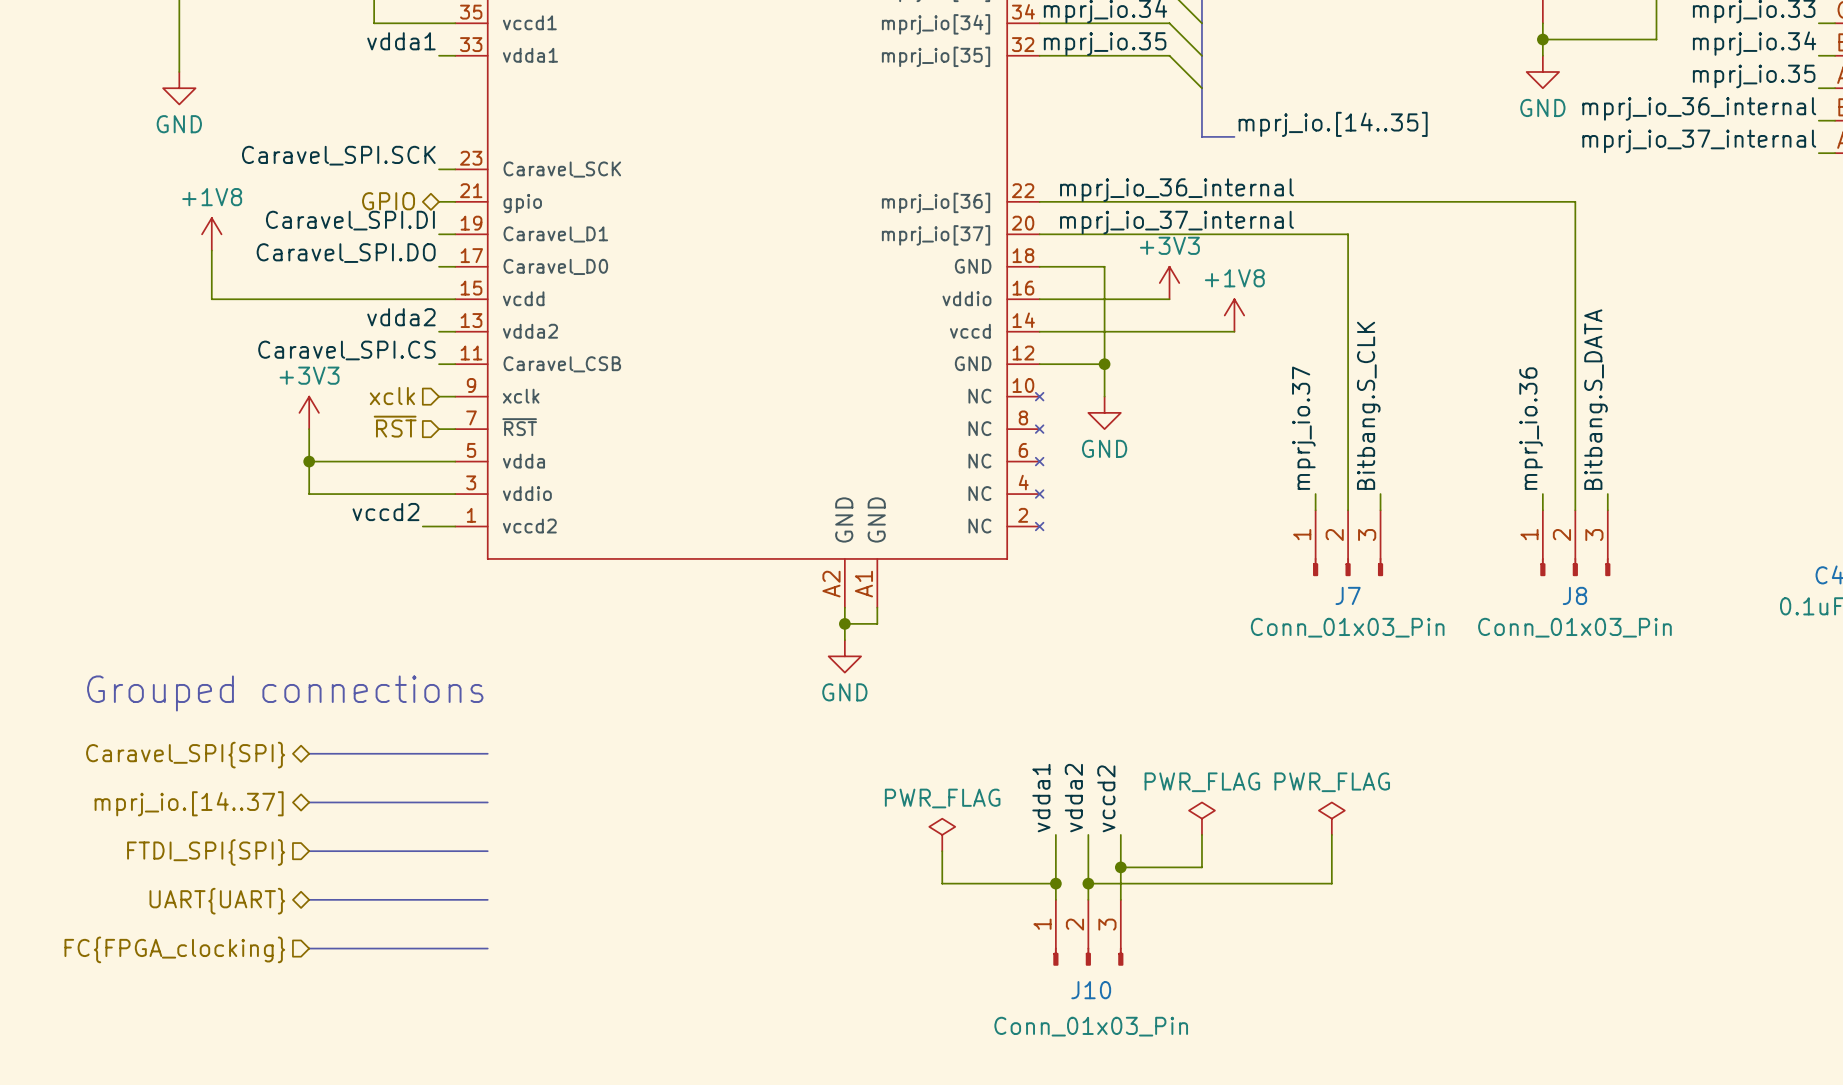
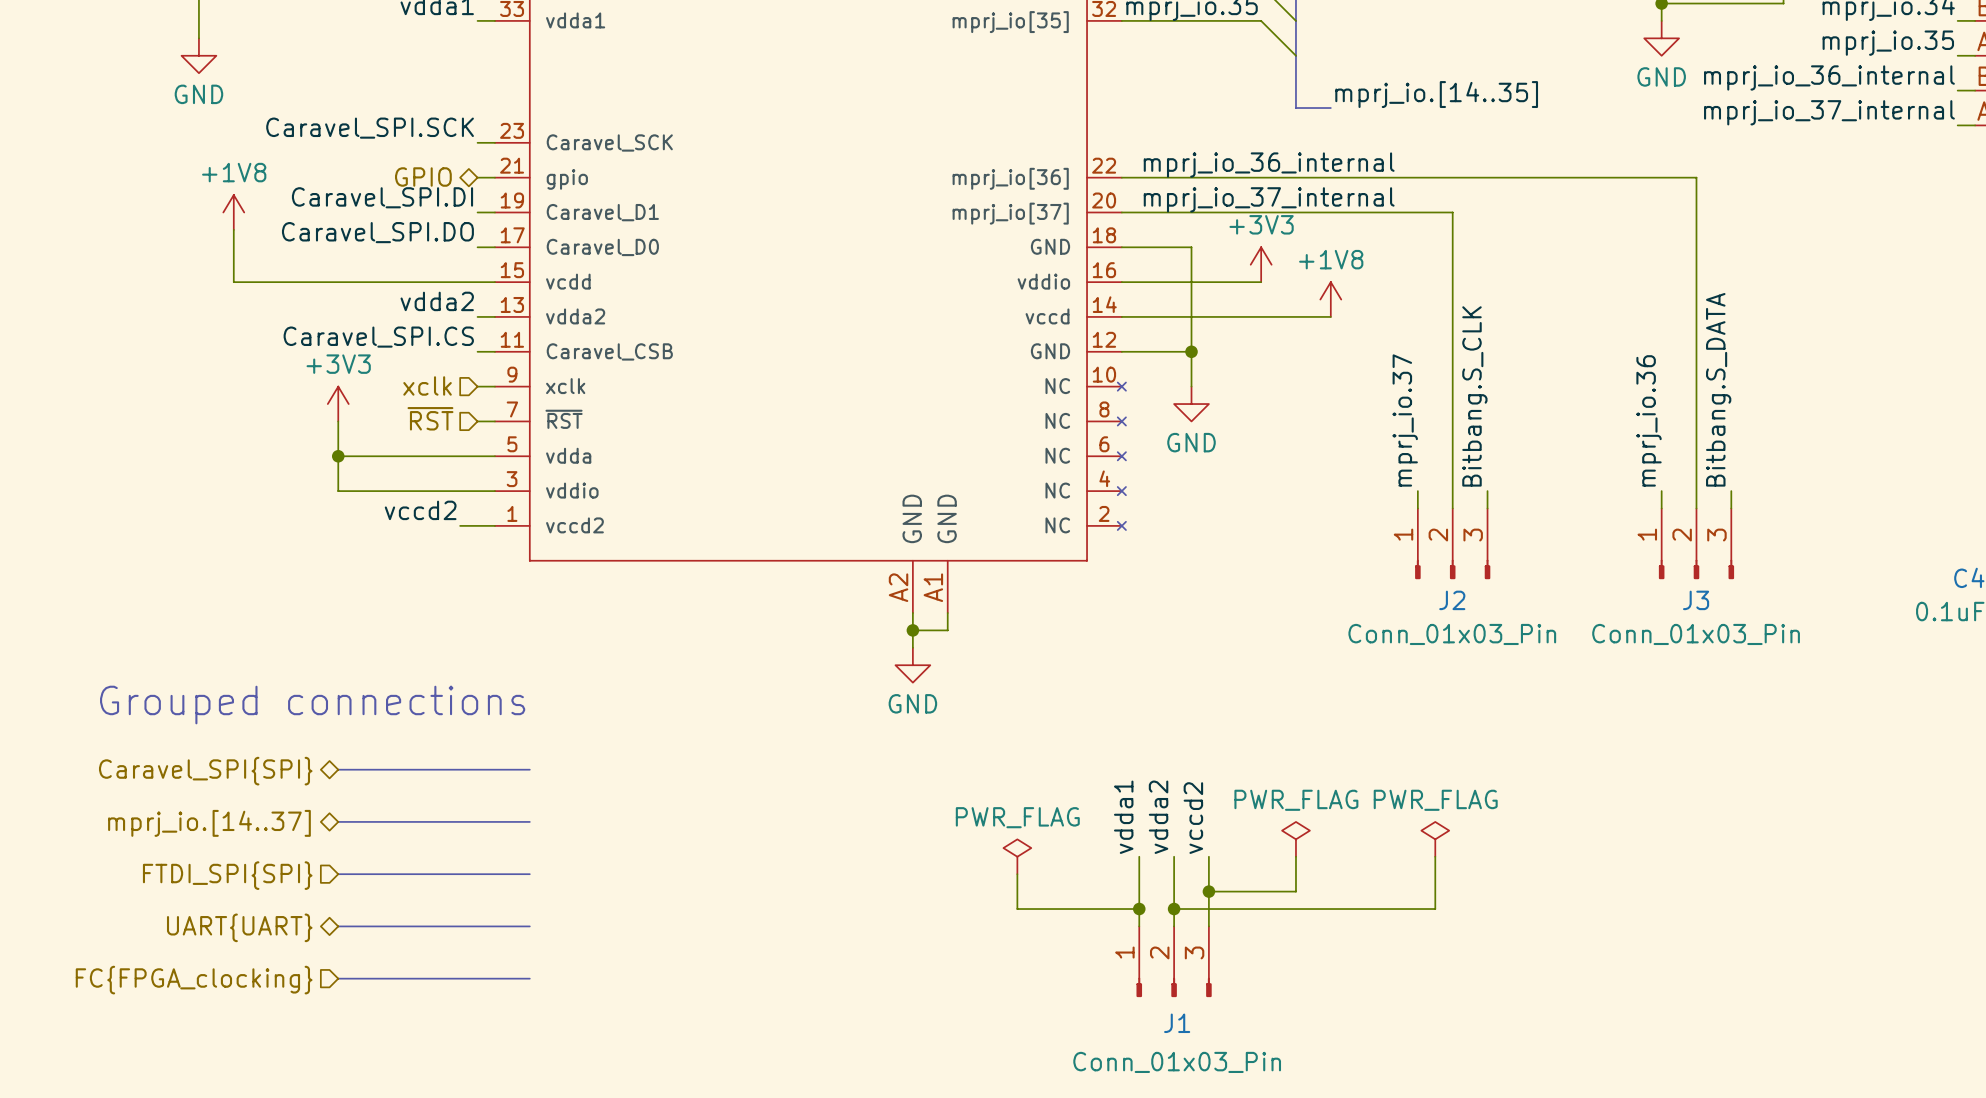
J7 name: J7 (1348, 595) -> J2 (1452, 600)
J8 name: J8 (1574, 595) -> J3 (1696, 600)
J10 name: J10 (1091, 990) -> J1 (1177, 1023)

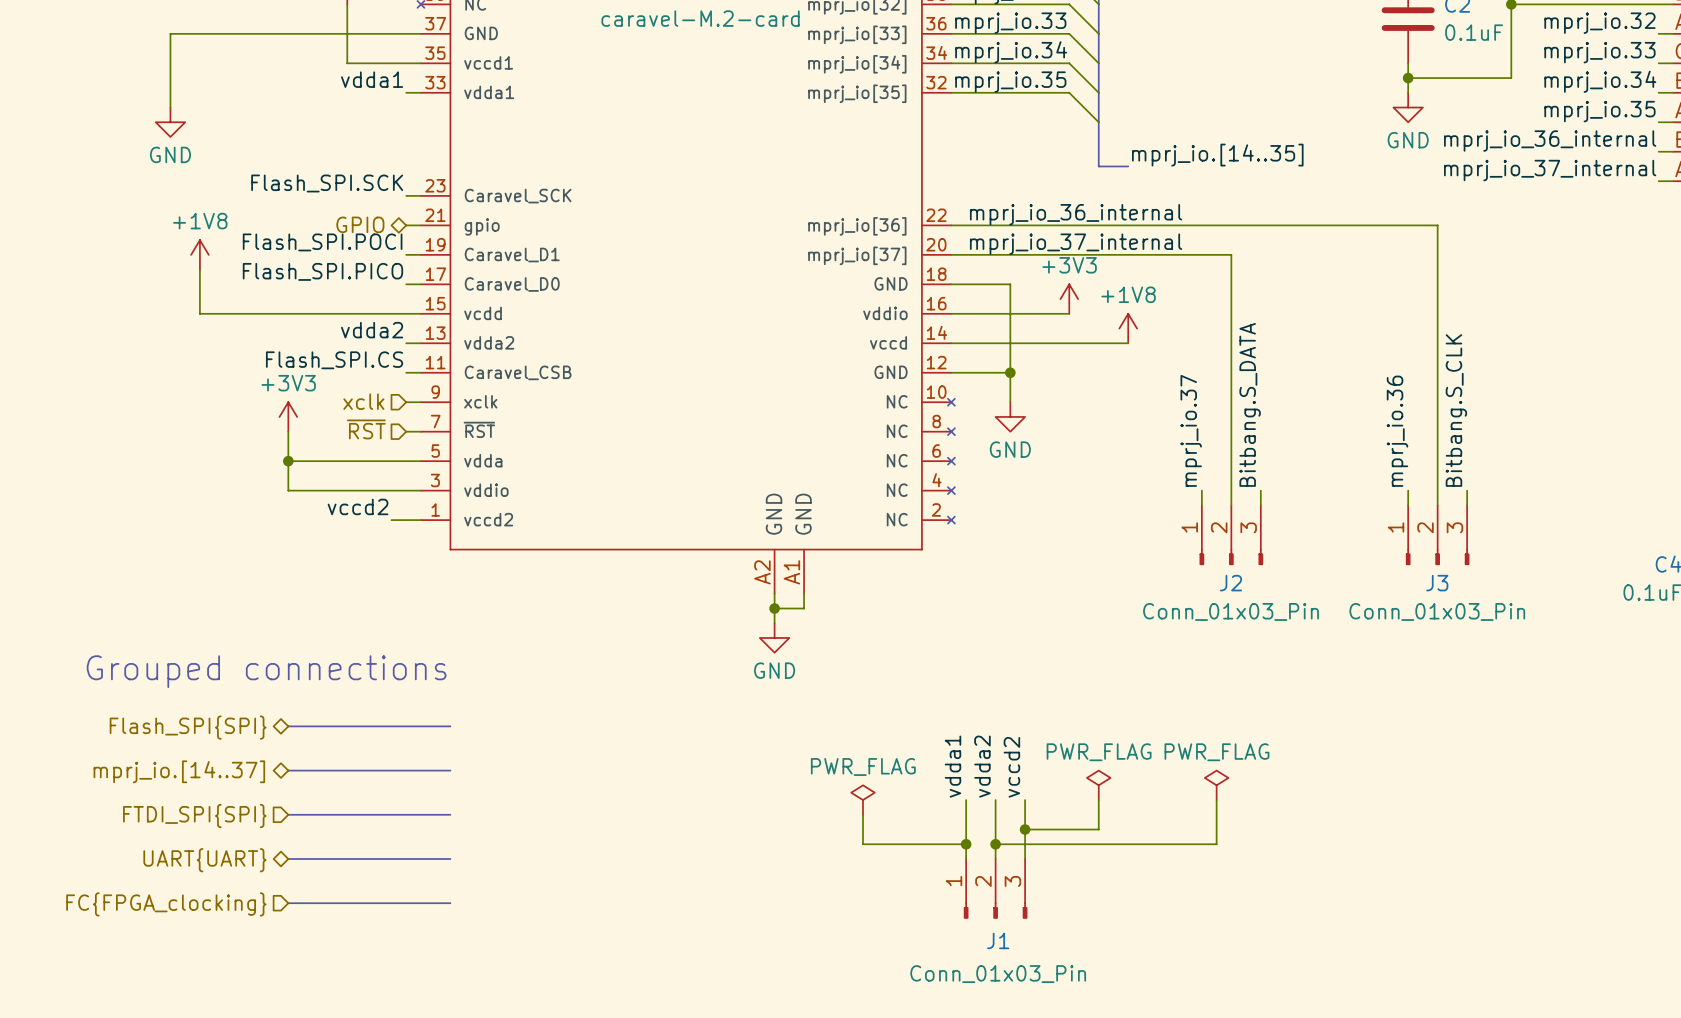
label: Caravel_SPI.SCK (370, 128) -> Flash_SPI.SCK (327, 183)
label: Caravel_SPI.DI (382, 197) -> Flash_SPI.POCI (322, 242)
label: Caravel_SPI.DO (377, 232) -> Flash_SPI.PICO (322, 271)
label: Caravel_SPI.CS (378, 337) -> Flash_SPI.CS (334, 360)
label: Bitbang.S_DATA (1718, 389) -> Bitbang.S_CLK (1456, 410)
label: Bitbang.S_CLK (1474, 396) -> Bitbang.S_DATA (1250, 404)
hierarchical label: Caravel_SPI{SPI} (205, 771) -> Flash_SPI{SPI} (188, 727)

